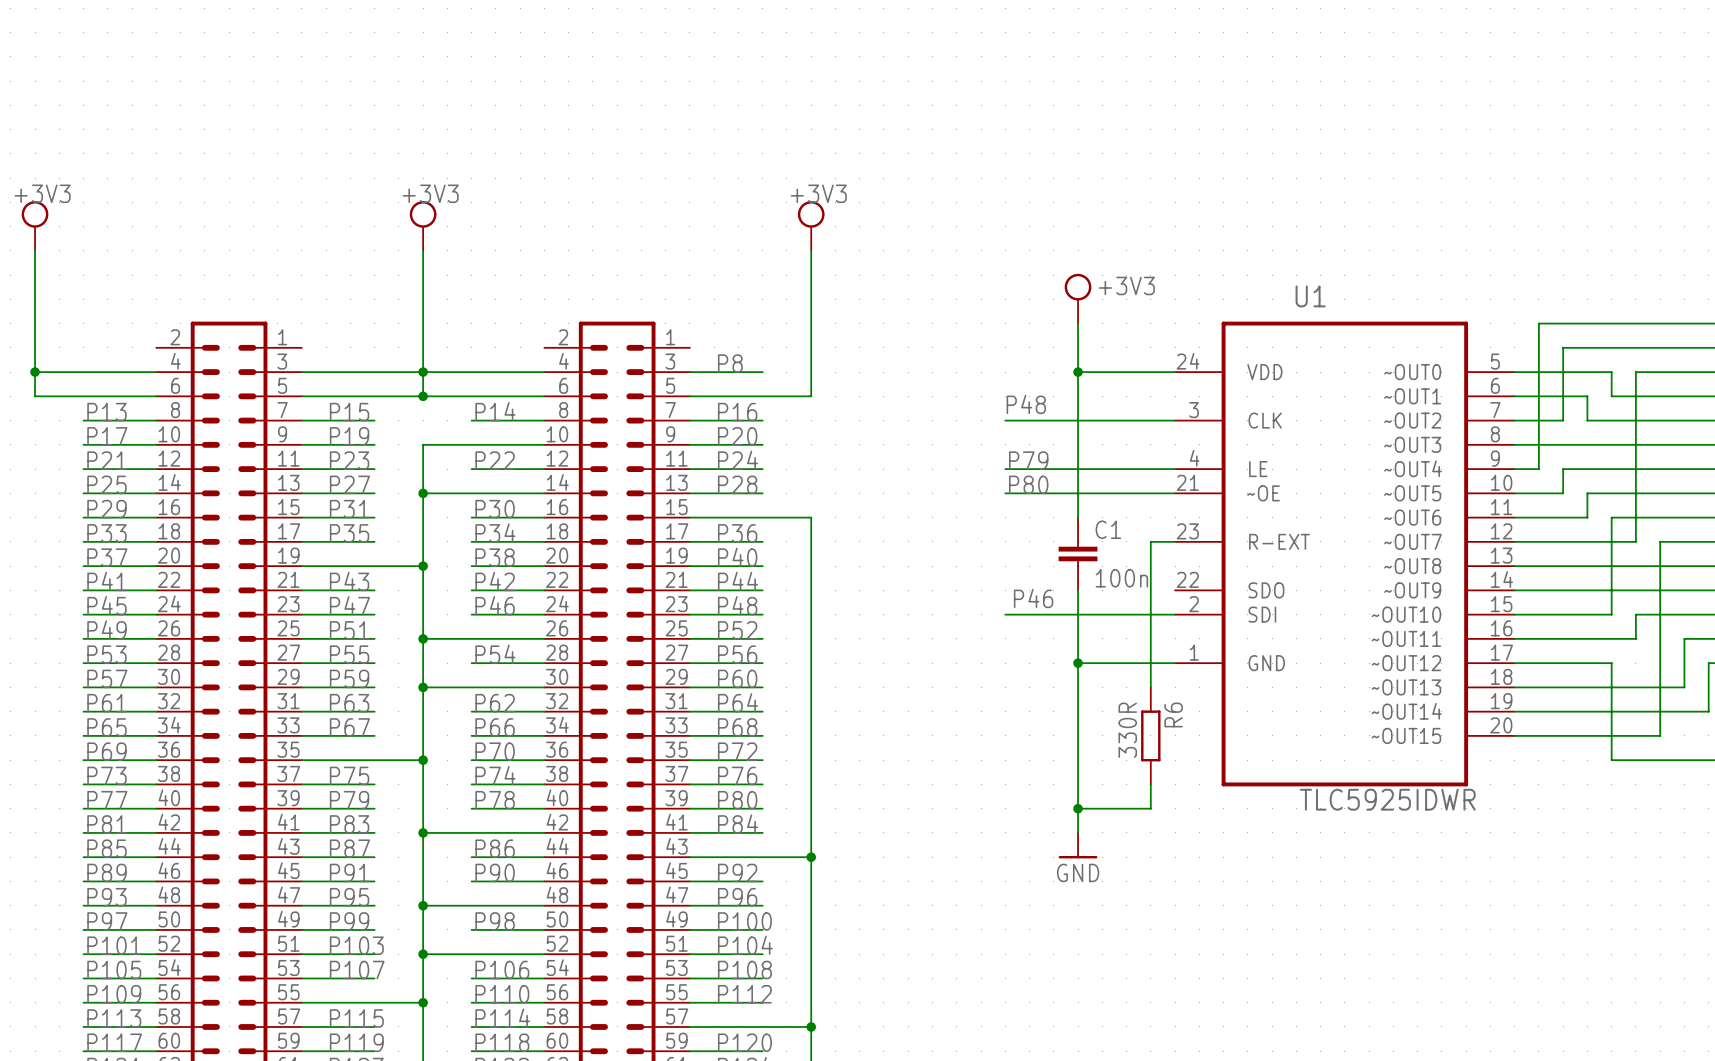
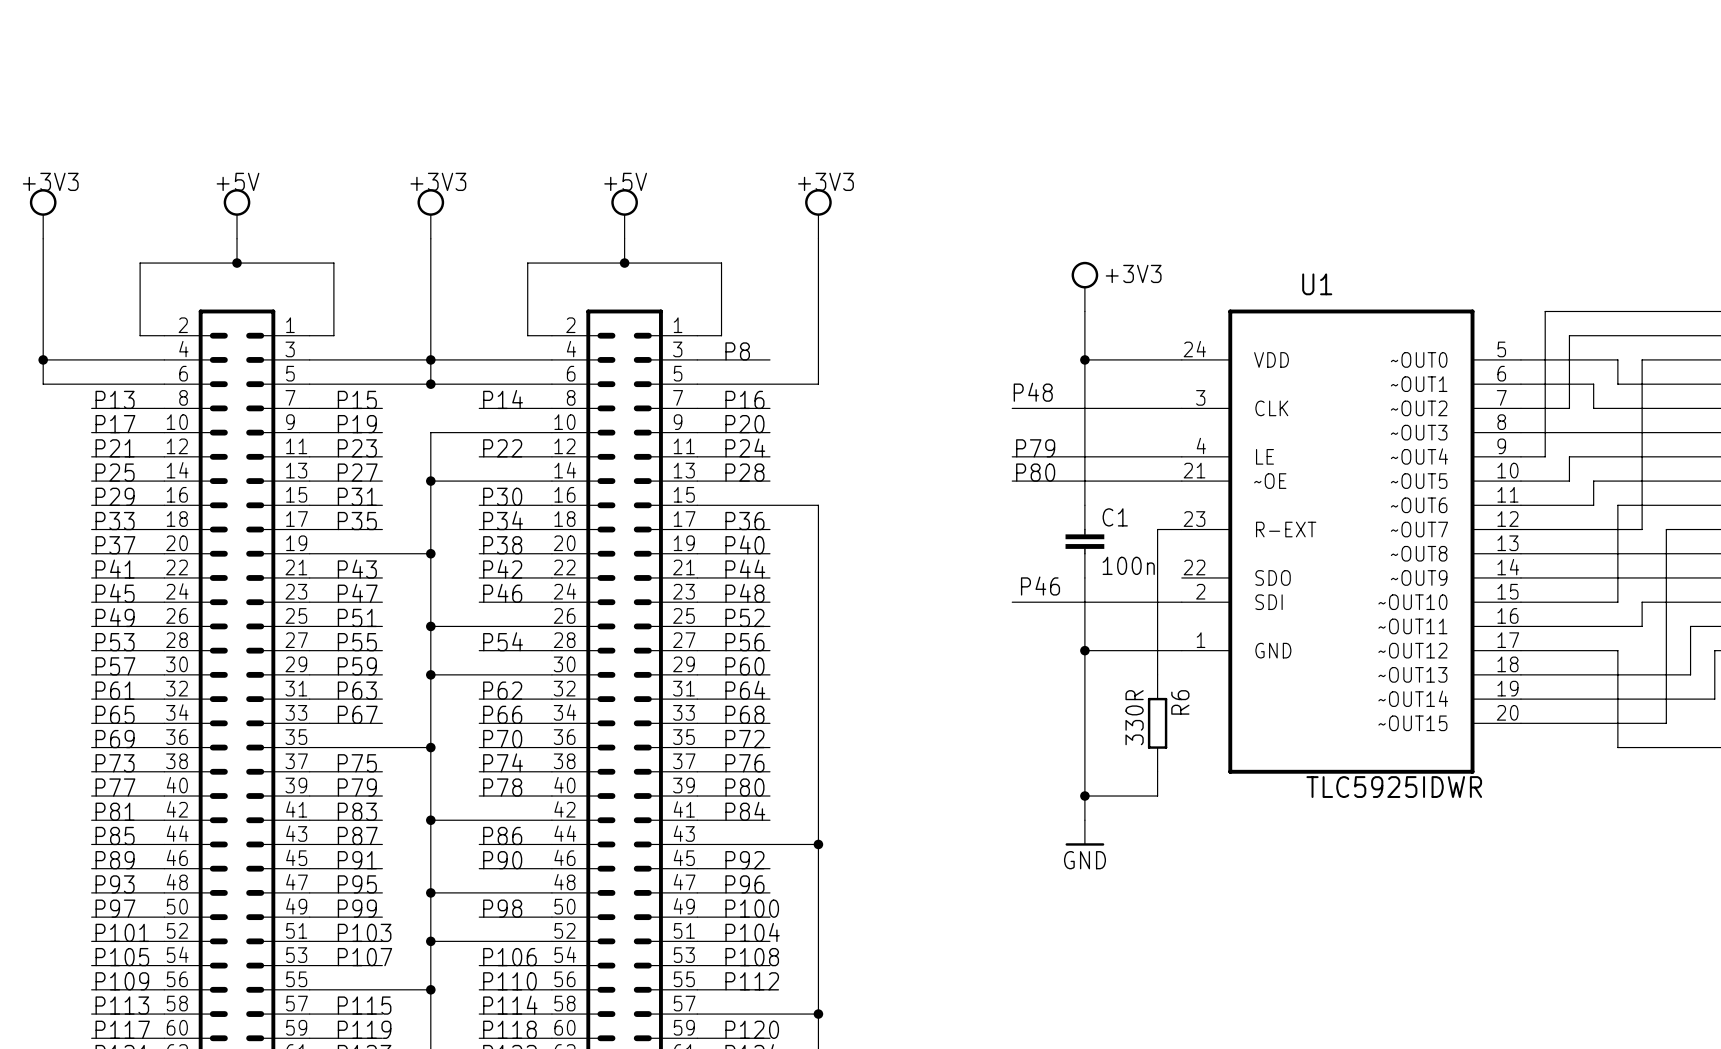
label: none -> +5V (238, 181)
label: none -> +5V (625, 181)
power symbol: none -> (237, 213)
power symbol: none -> (624, 213)
wire: none -> (237, 238) (237, 263)
wire: none -> (624, 238) (624, 263)
junction: none -> (237, 263)
junction: none -> (624, 263)
wire: none -> (164, 335) (140, 335) (140, 263) (333, 263) (333, 335) (309, 335)
wire: none -> (551, 335) (527, 335) (527, 263) (721, 263) (721, 335) (697, 335)

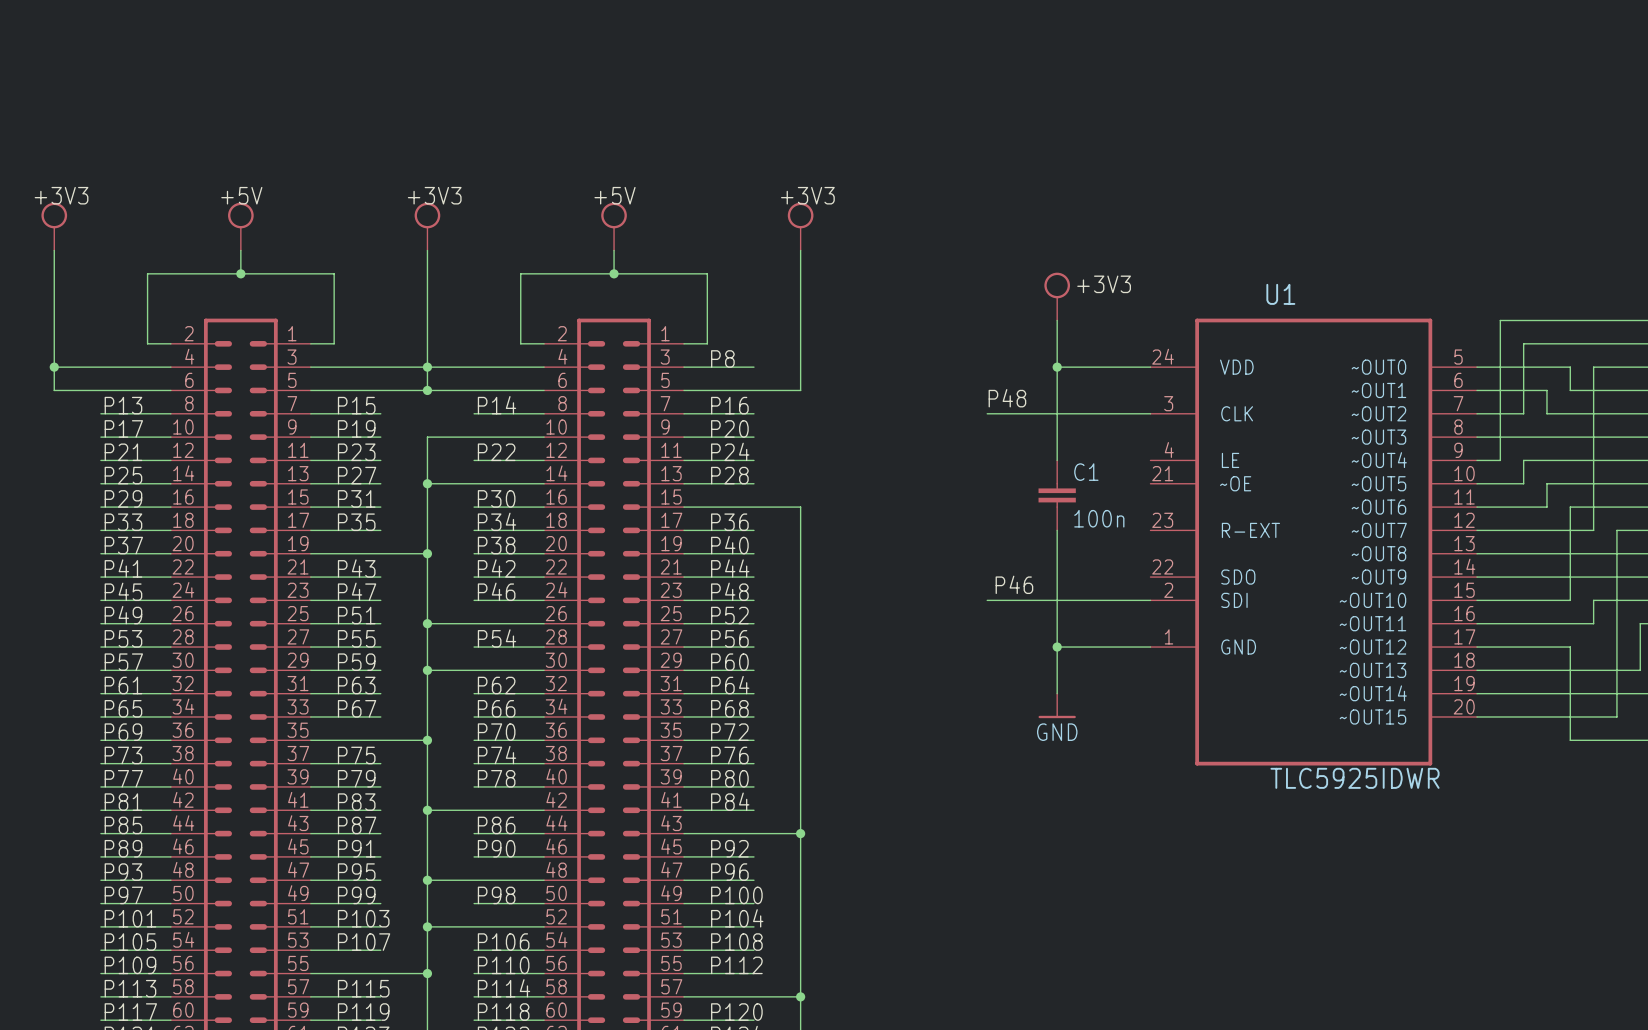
label: P79 (1035, 448) -> none
wire: (1012, 456) (1181, 456) -> none
label: P80 (1035, 472) -> none
wire: (1012, 481) (1181, 481) -> none
wire: (1181, 529) (1157, 529) (1157, 674) -> none
C1 position: (1084, 541) -> (1057, 495)
wire: (1084, 699) (1084, 820) -> none
R6: 330R (1157, 723) -> none
wire: (1157, 771) (1157, 796) (1084, 796) -> none
junction: (1084, 796) -> none
power symbol position: GND (1084, 832) -> GND (1057, 705)

